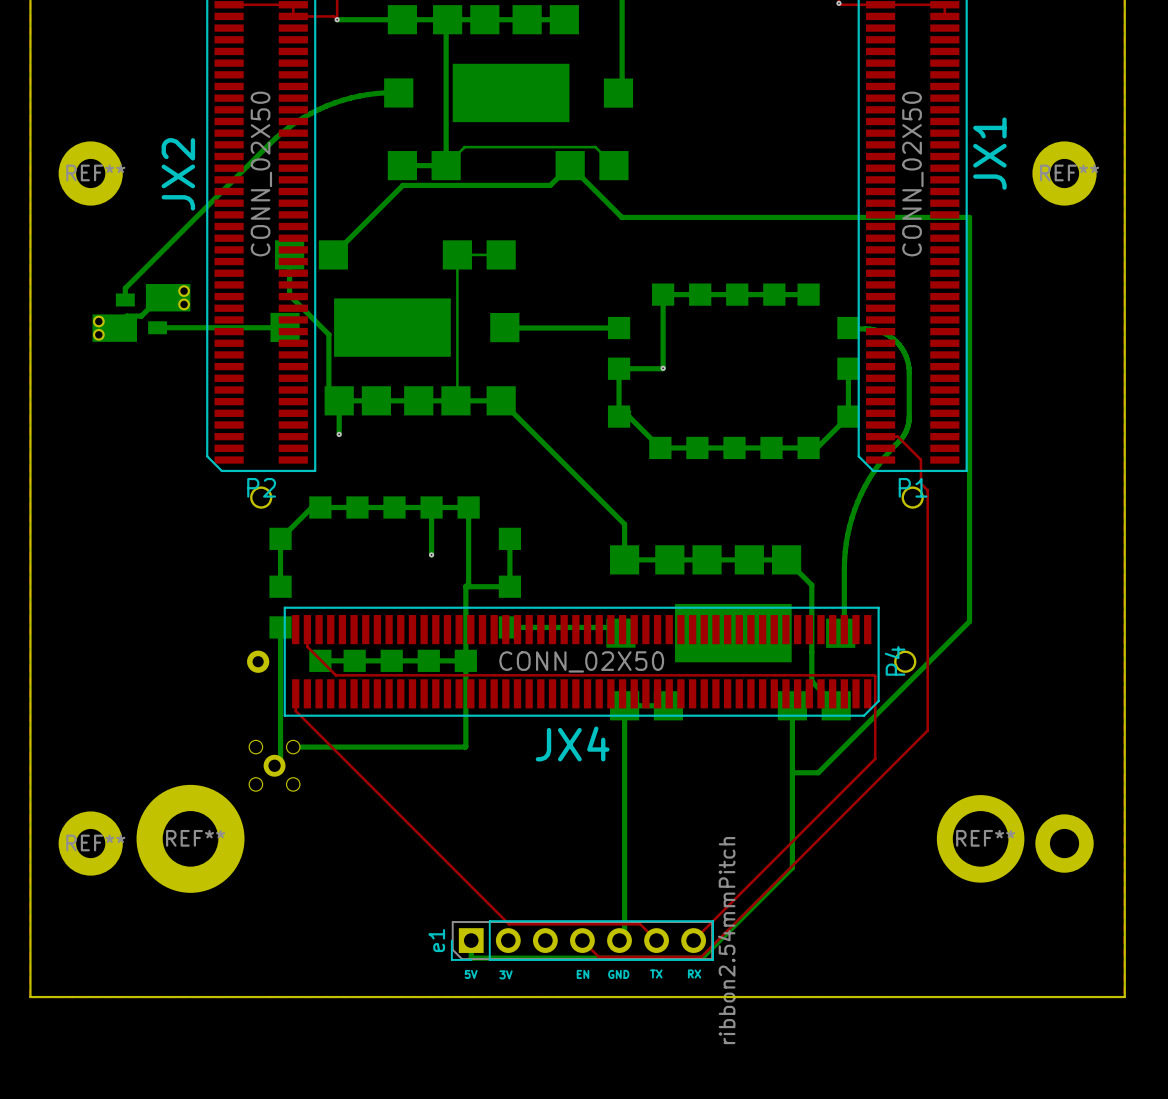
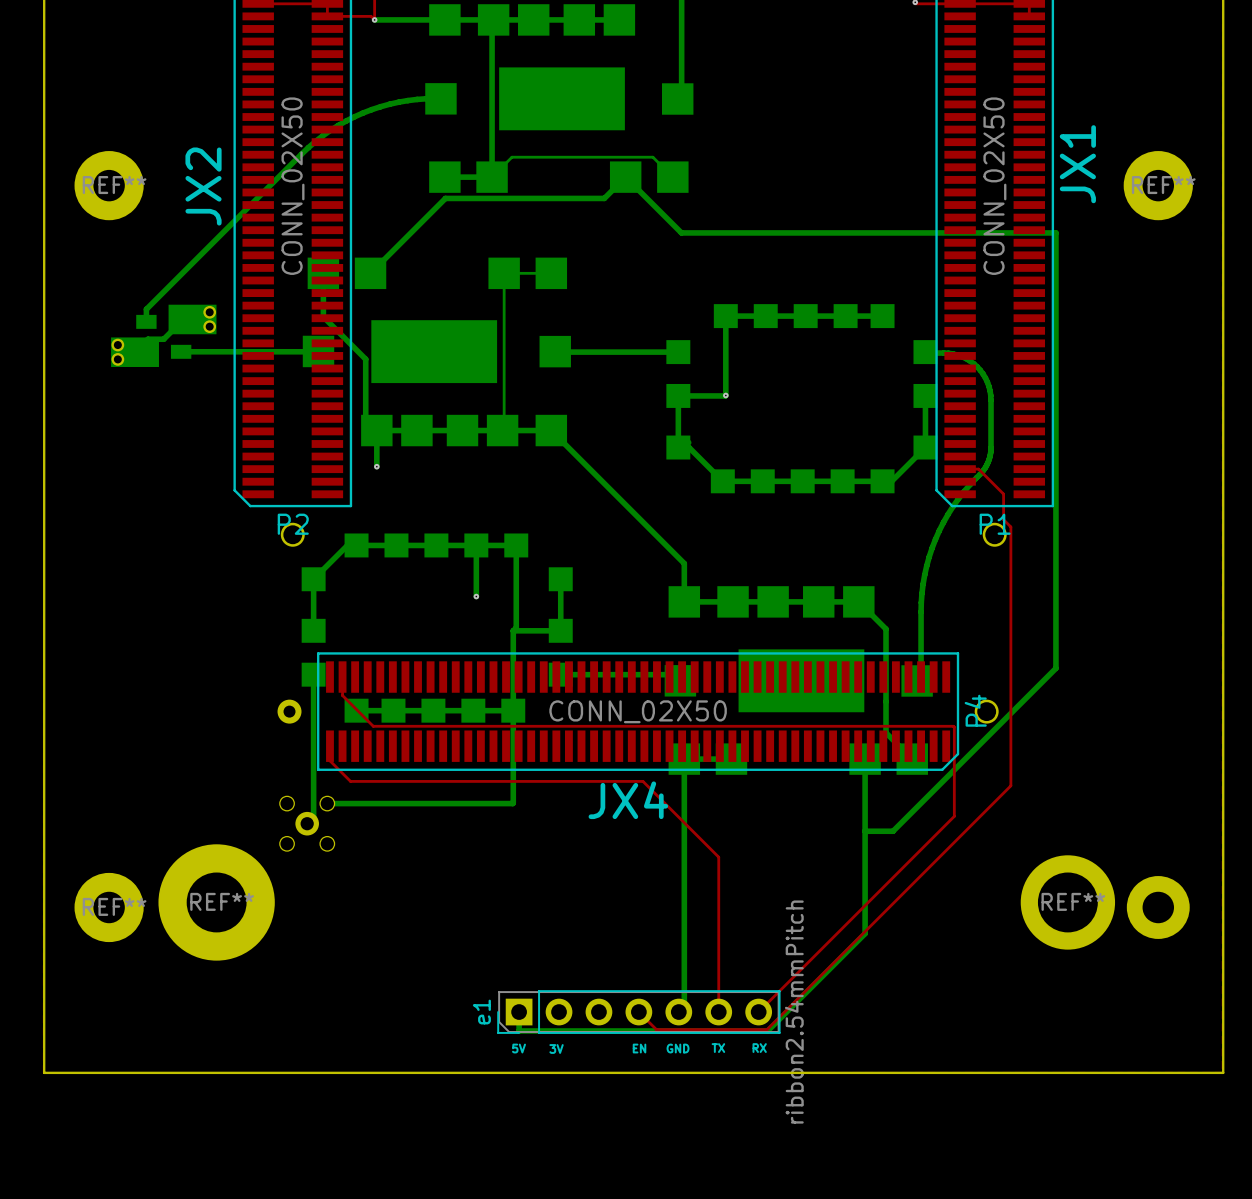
top track: (295, 707) (295, 711) (508, 924) (640, 924) (656, 940) -> (329, 760) (350, 781) (642, 781) (718, 857) (718, 1012)

